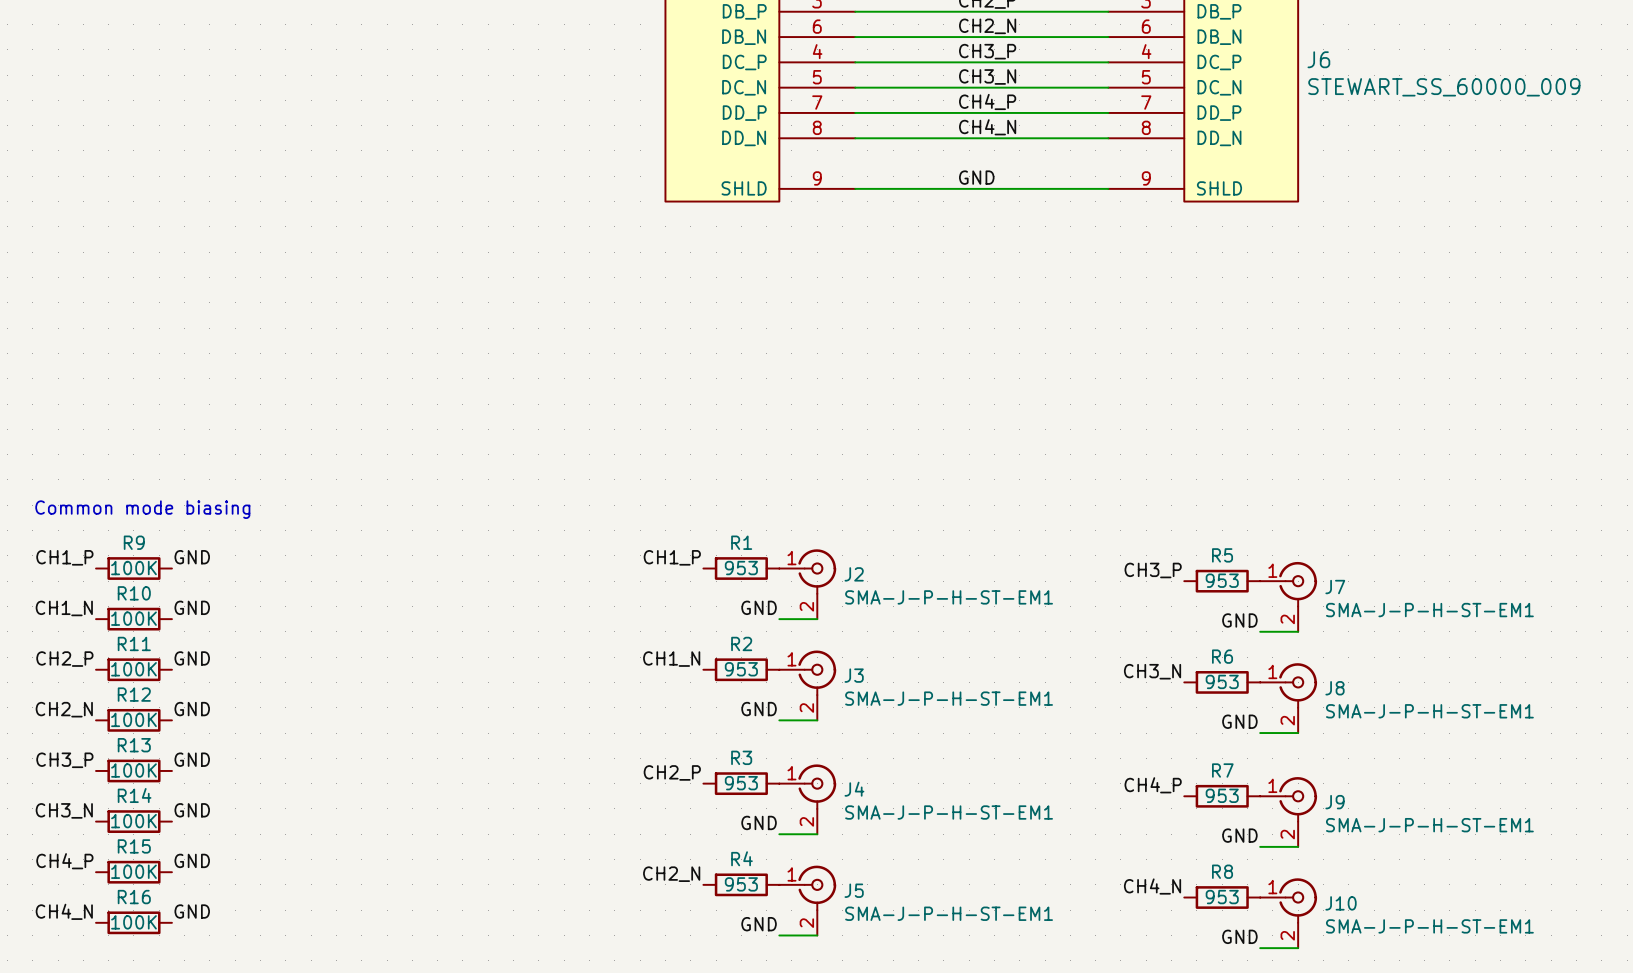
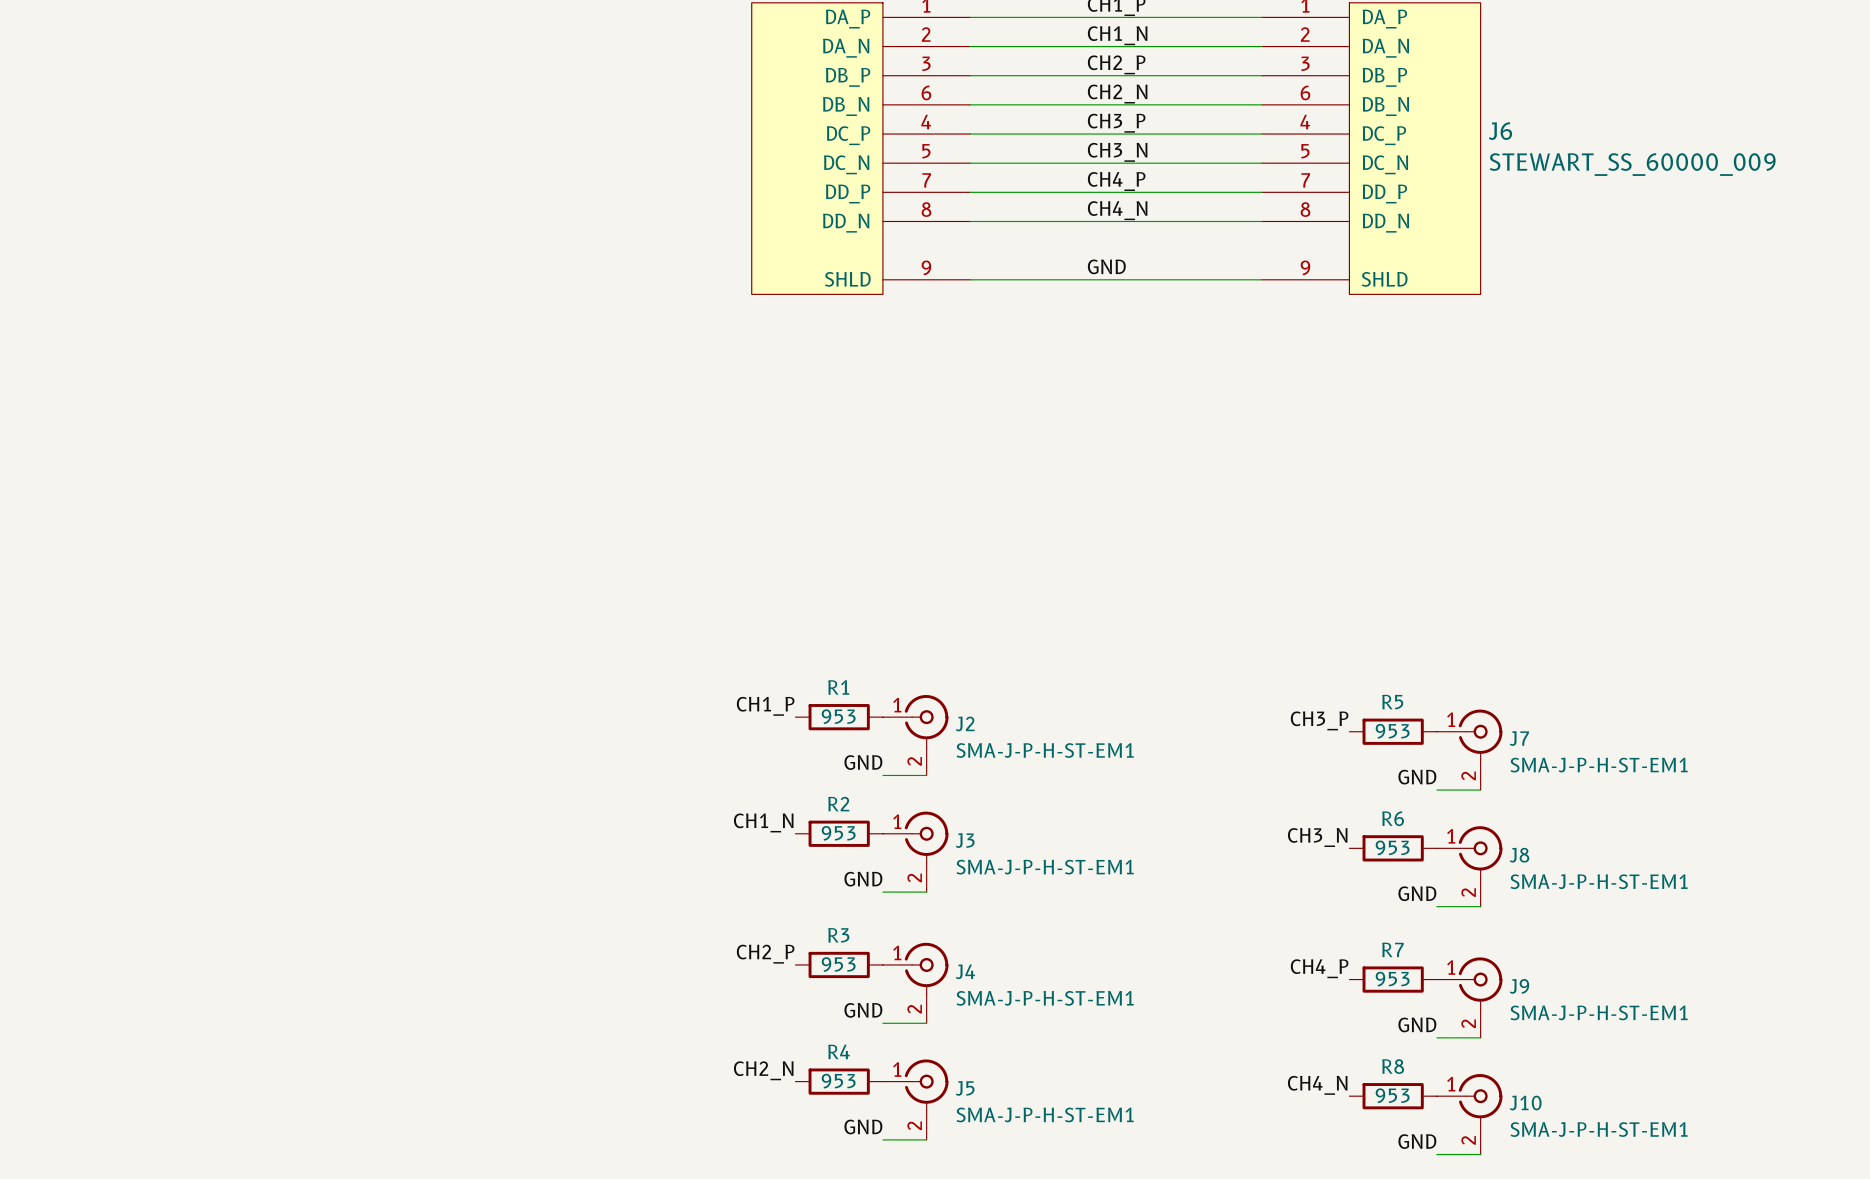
text: Common mode biasing (142, 509) -> none
label: CH1_P (64, 557) -> none
label: GND (192, 557) -> none
R9: 100K (133, 568) -> none
label: GND (192, 607) -> none
label: CH1_N (64, 608) -> none
R10: 100K (133, 619) -> none
label: GND (192, 658) -> none
label: CH2_P (64, 659) -> none
R11: 100K (133, 669) -> none
label: CH2_N (64, 709) -> none
label: GND (192, 709) -> none
R12: 100K (133, 720) -> none
label: GND (192, 759) -> none
label: CH3_P (64, 760) -> none
R13: 100K (133, 770) -> none
label: CH3_N (64, 810) -> none
label: GND (192, 810) -> none
R14: 100K (133, 821) -> none
label: GND (192, 860) -> none
label: CH4_P (64, 861) -> none
R15: 100K (133, 872) -> none
label: CH4_N (64, 911) -> none
label: GND (192, 911) -> none
R16: 100K (133, 922) -> none

